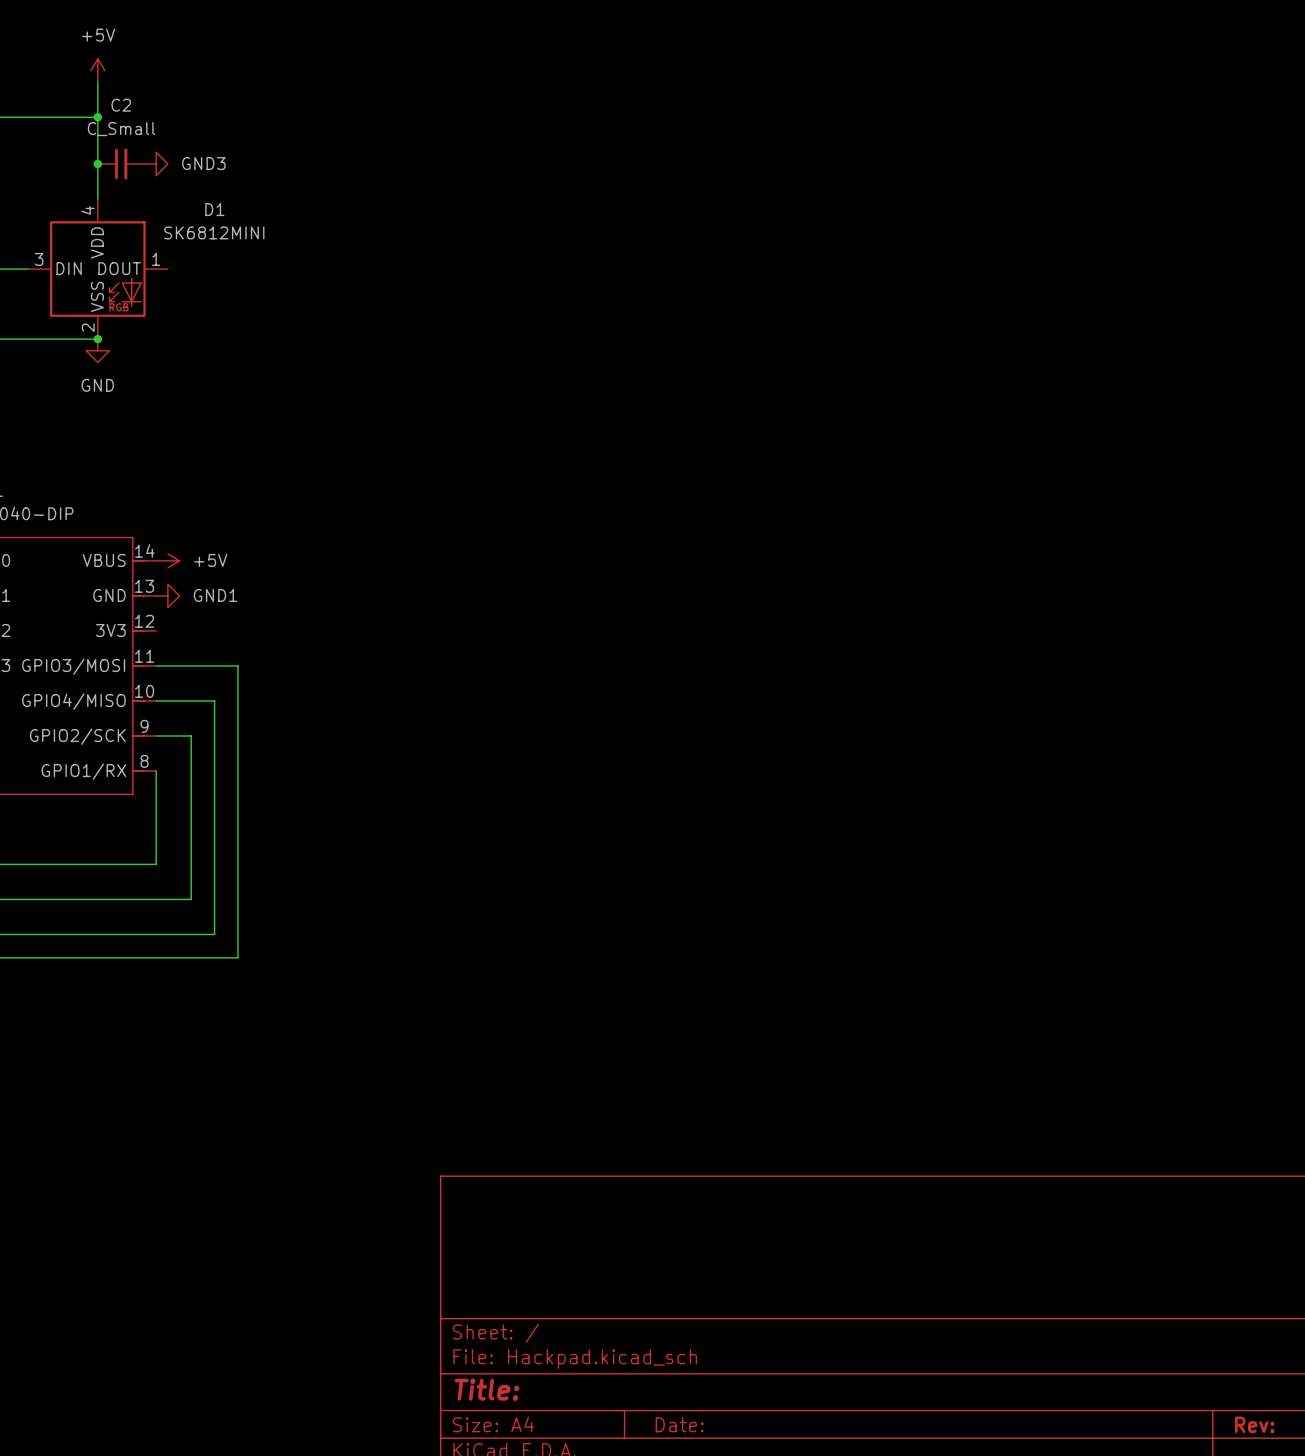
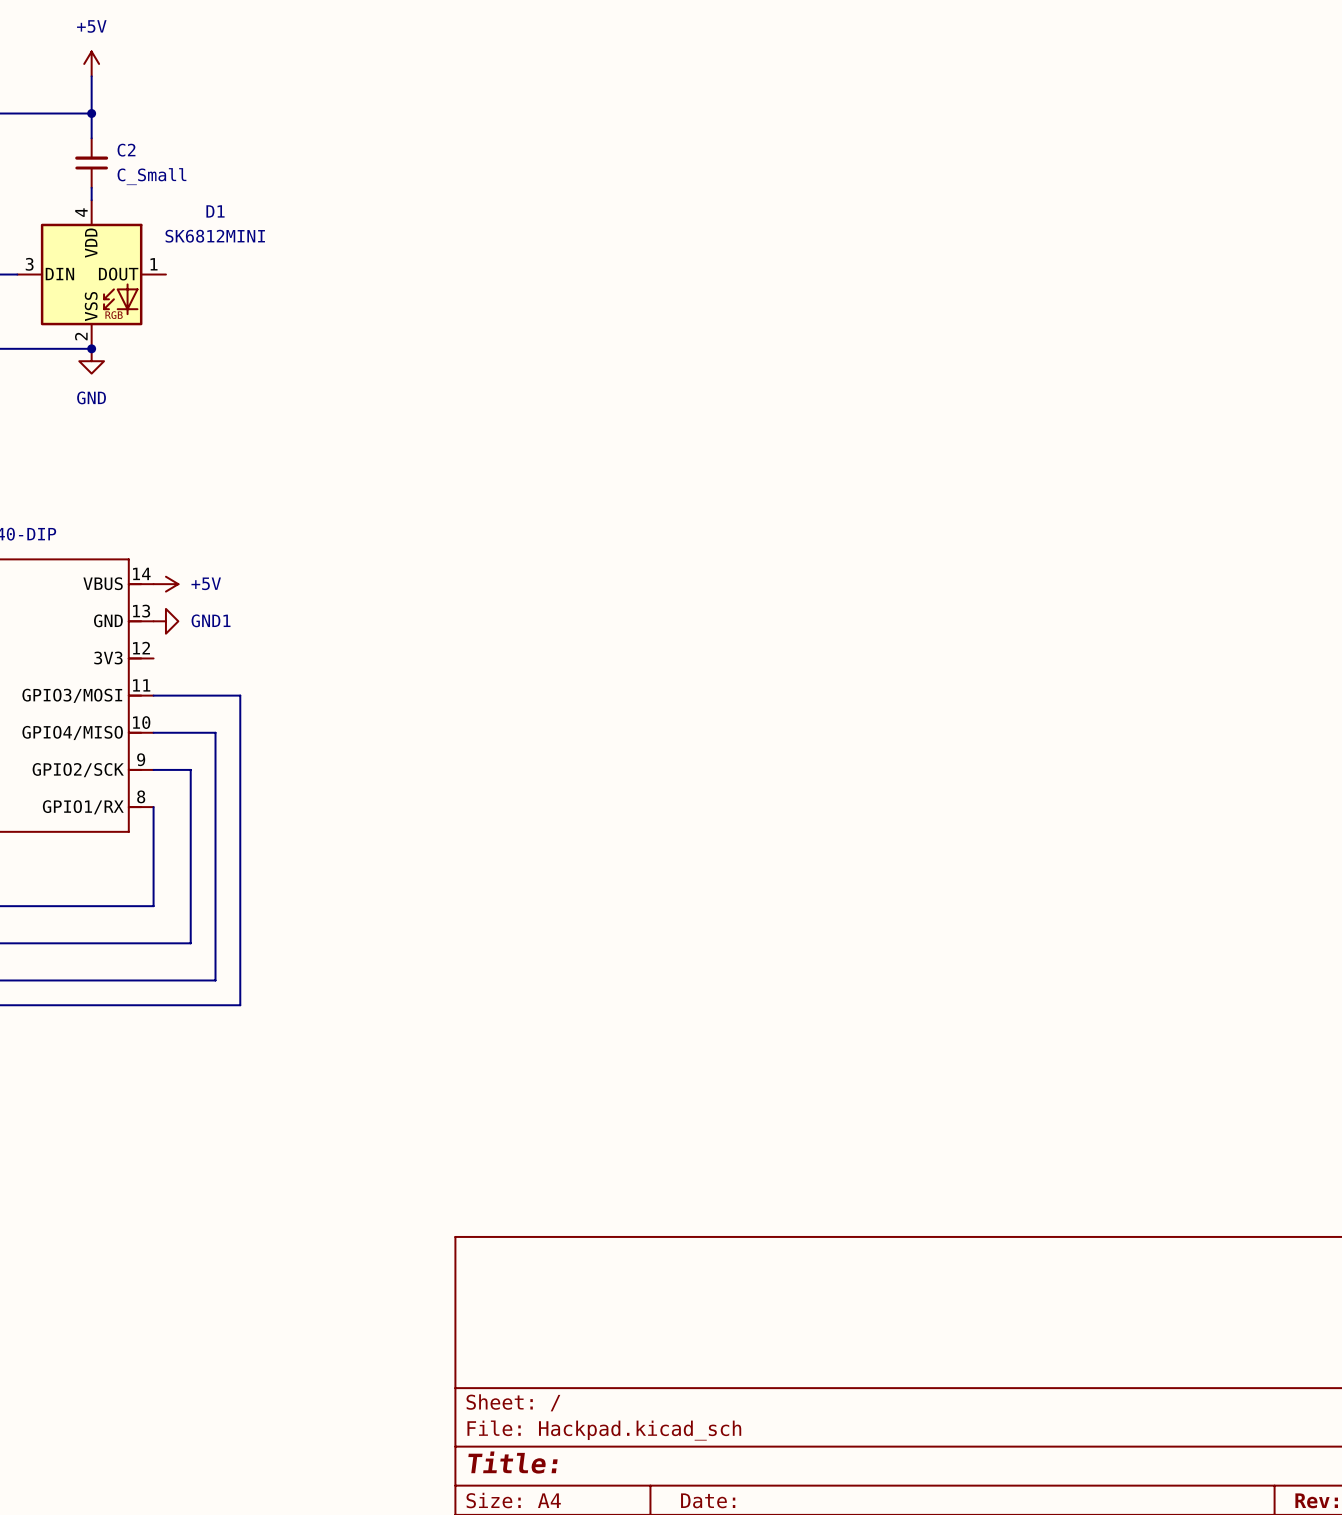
C2 name position: C2 (121, 105) -> C2 (126, 150)
C2 value position: C_Small (121, 129) -> C_Small (151, 176)
junction: (97, 163) -> none
C2 rotation: 0° (121, 163) -> 90° counterclockwise (91, 162)
power symbol: GND3 (156, 163) -> none

